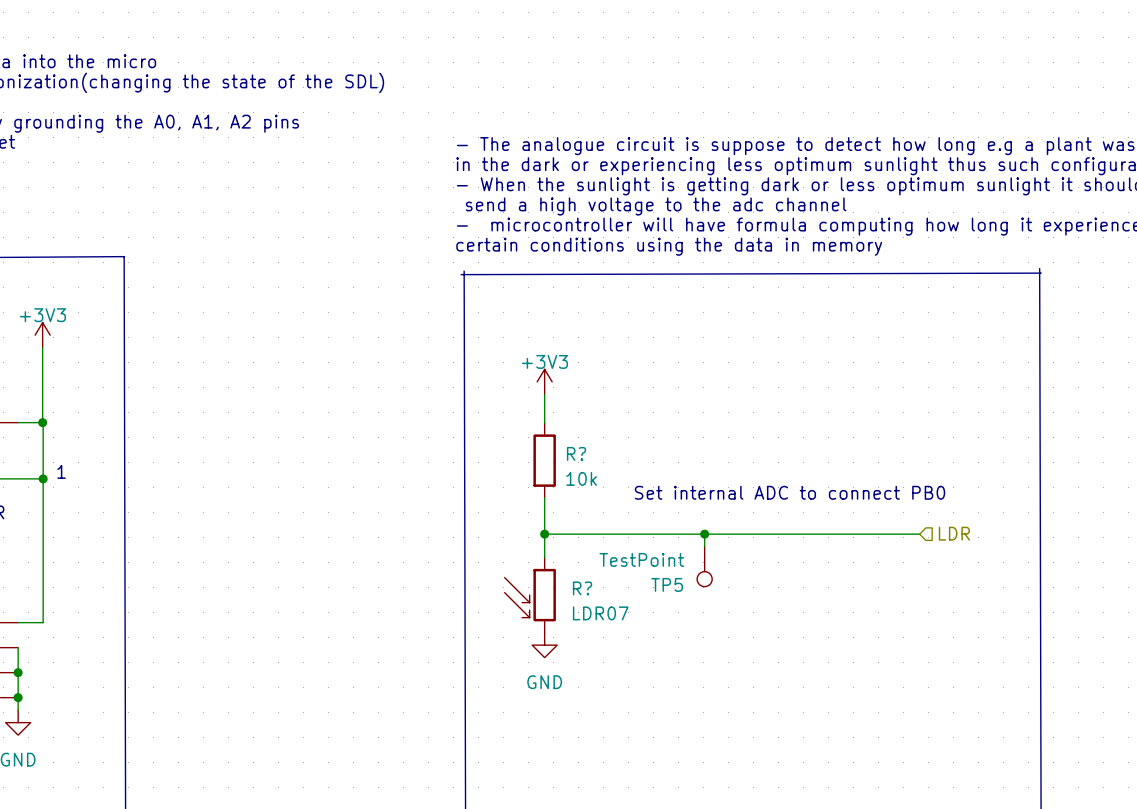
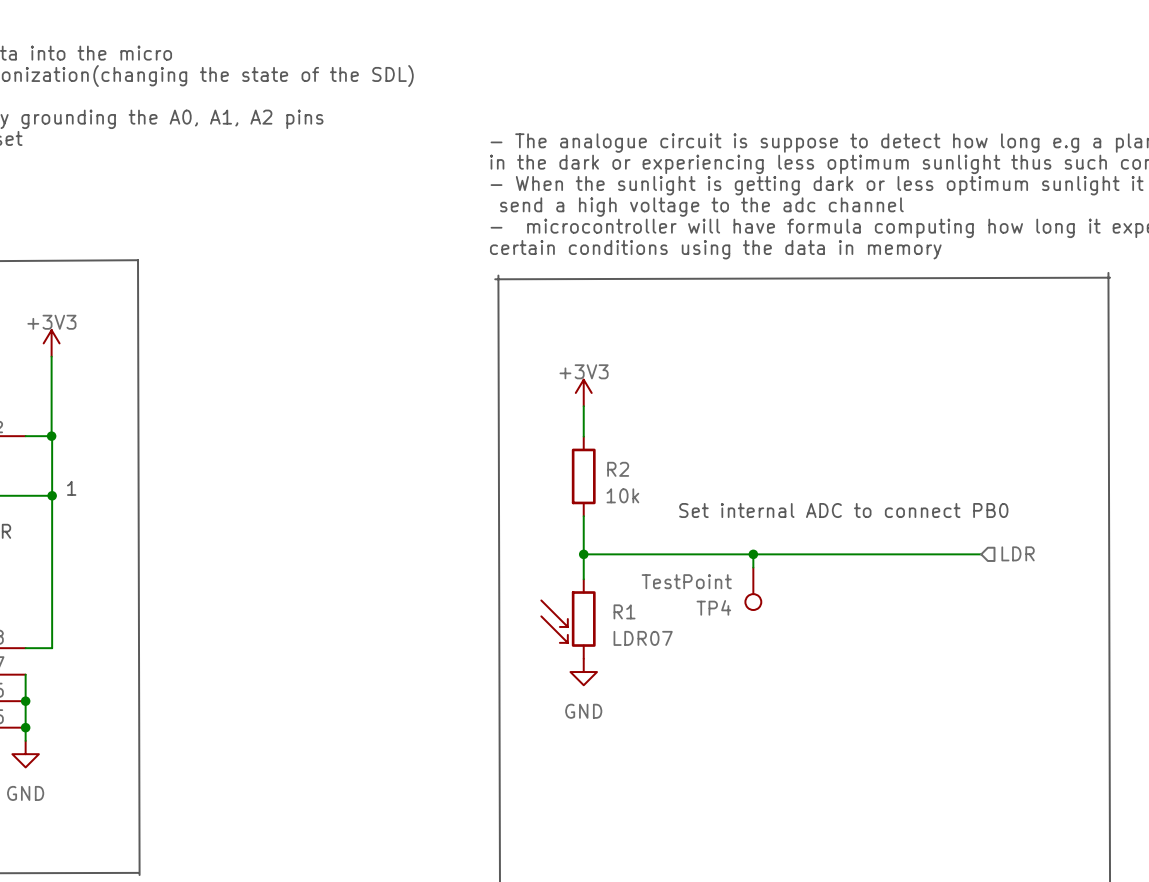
R? name: R? (576, 453) -> R2 (618, 469)
TP5 name: TP5 (667, 584) -> TP4 (713, 607)
R? name: R? (582, 588) -> R1 (624, 611)

